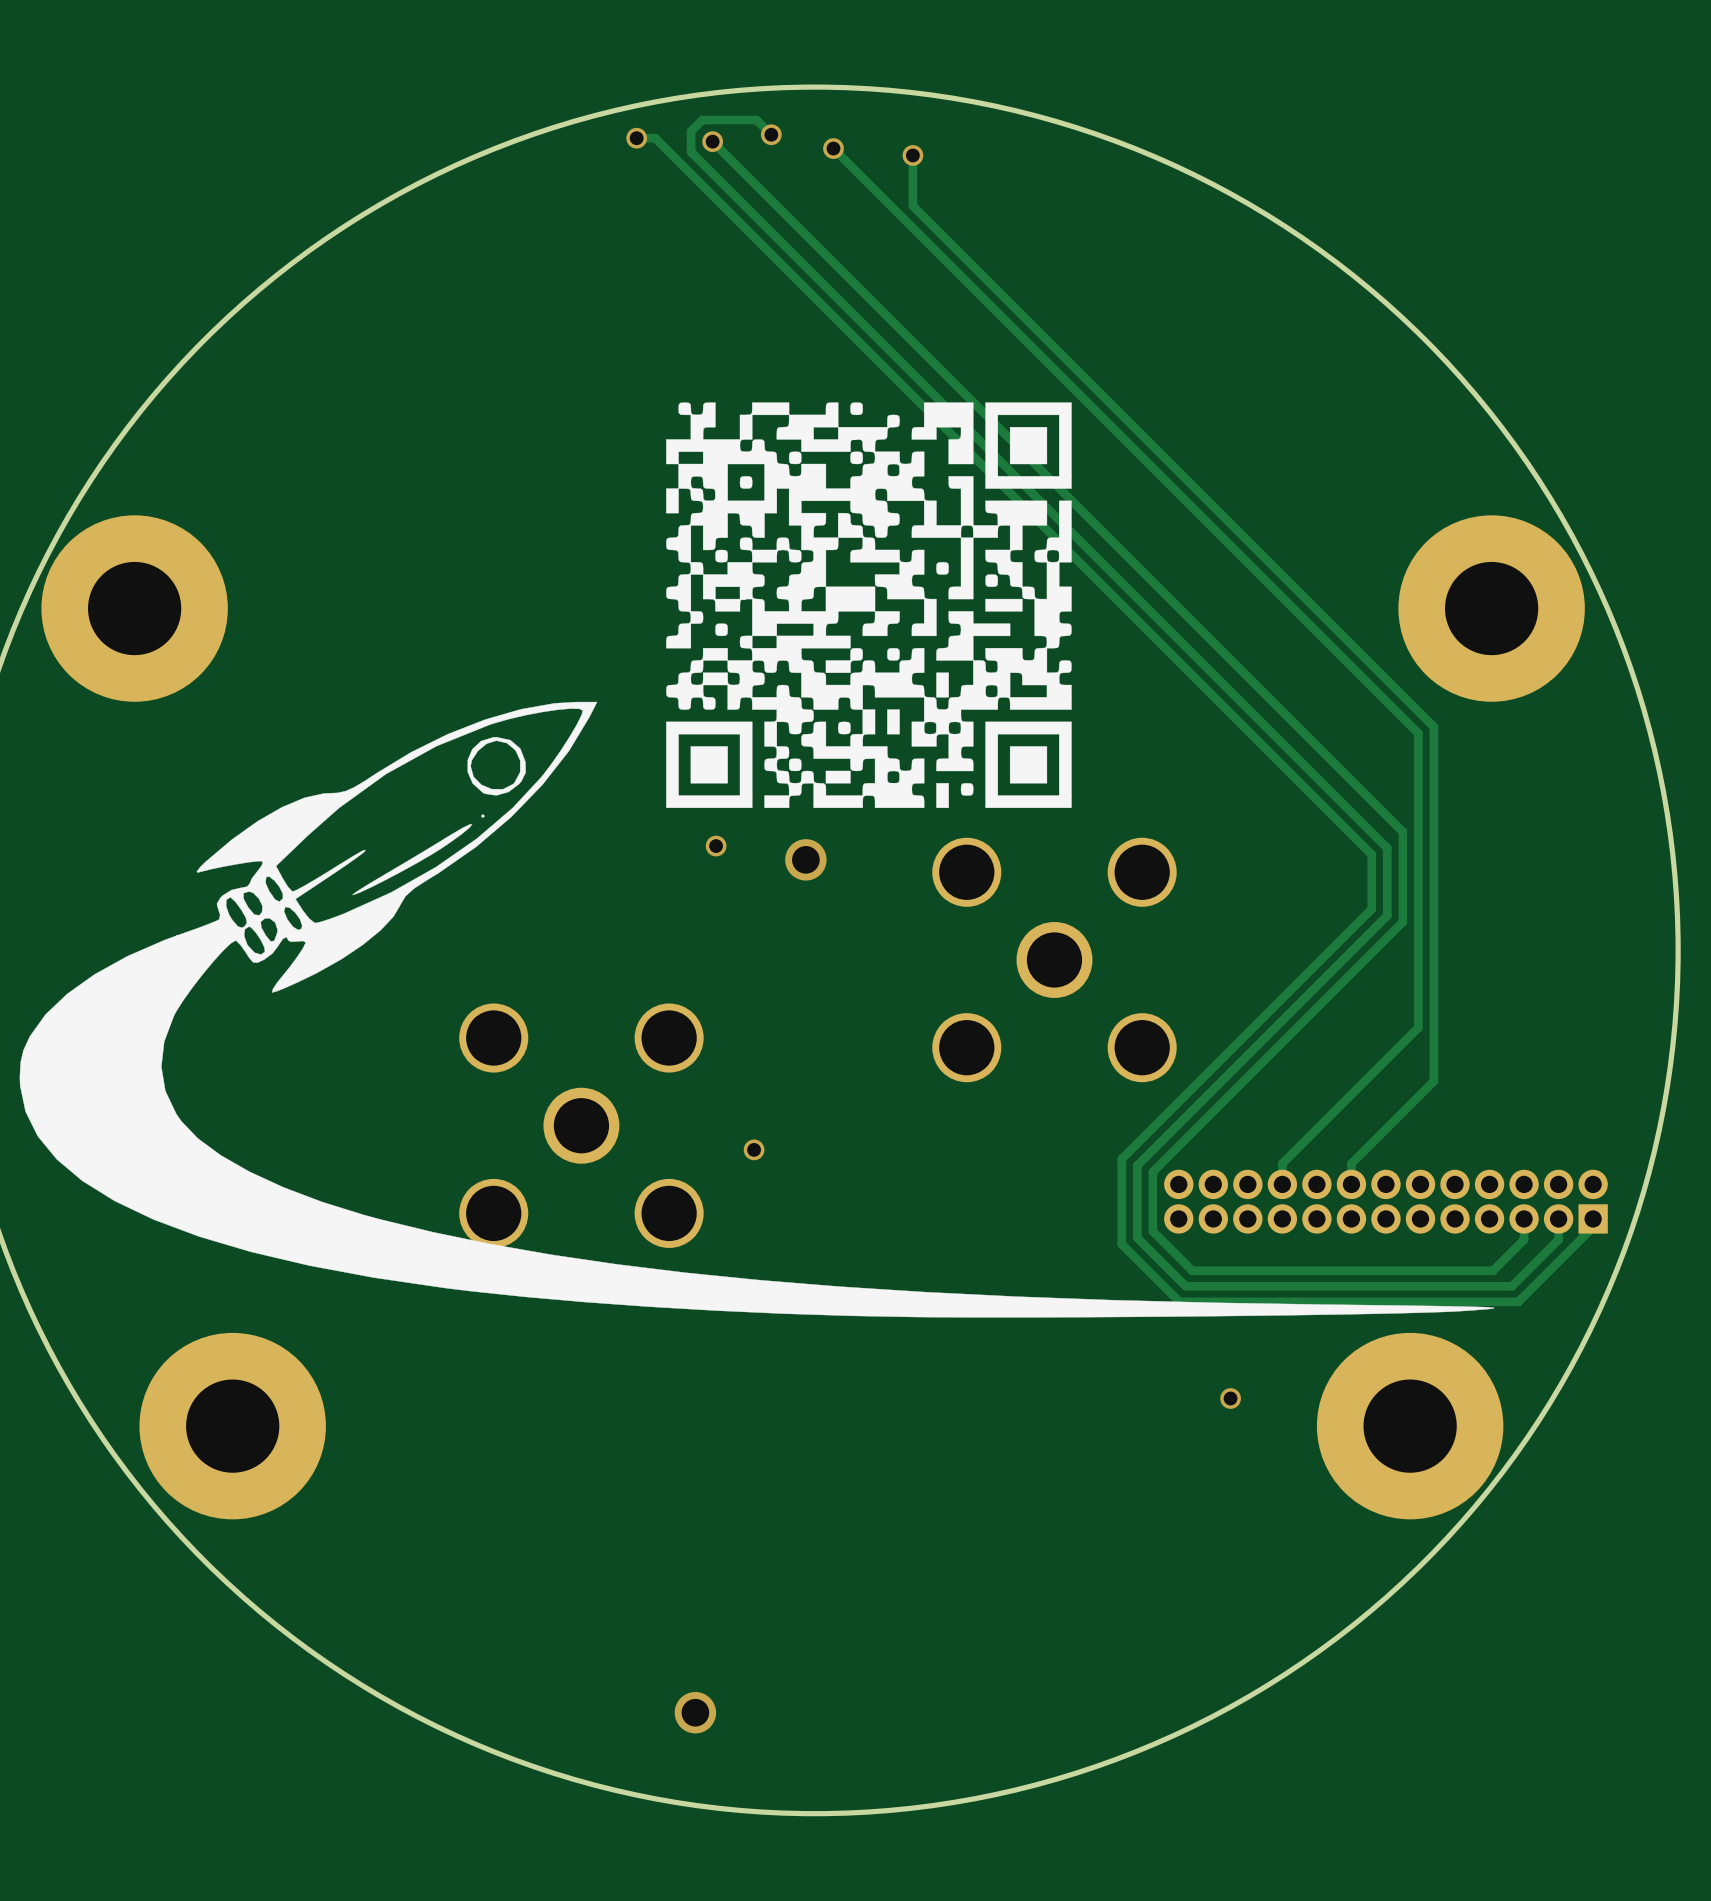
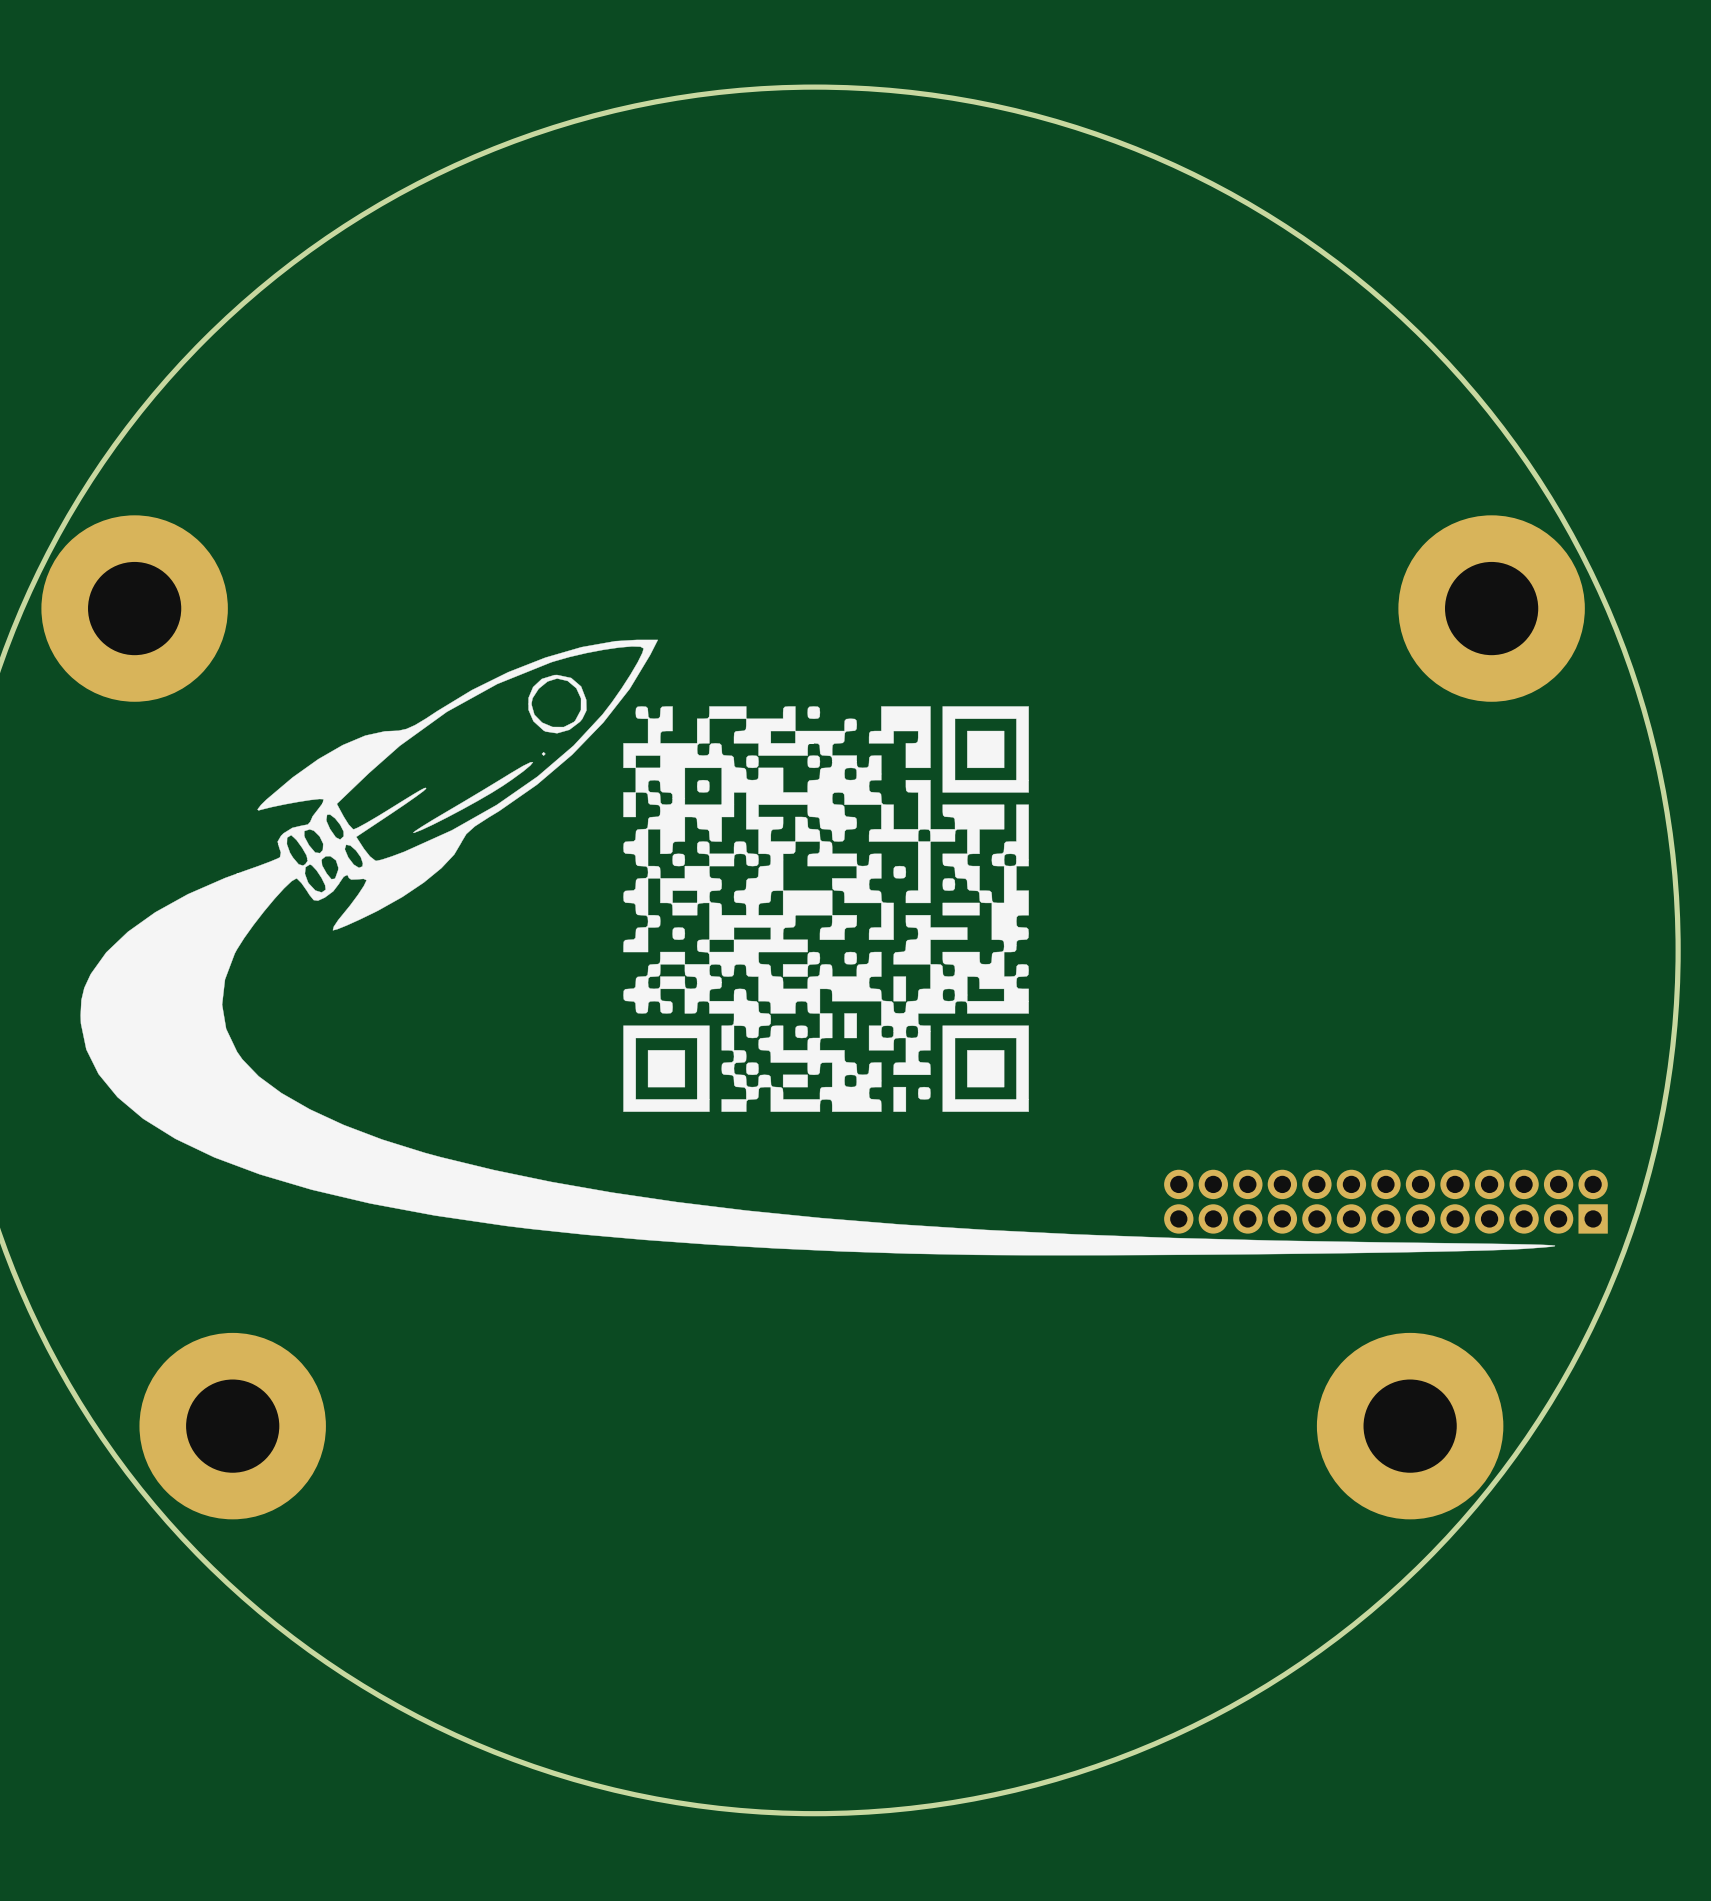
track: (771, 134) (756, 120) (702, 120) (691, 131) (691, 152) (1387, 848) (1387, 915) (1137, 1165) (1137, 1237) (1185, 1286) (1512, 1286) (1558, 1239) (1558, 1218) -> none
via: (771, 134) -> none
track: (636, 138) (655, 138) (1371, 854) (1371, 909) (1121, 1159) (1121, 1244) (1179, 1301) (1518, 1301) (1593, 1227) (1593, 1218) -> none
via: (636, 138) -> none
track: (712, 141) (1402, 831) (1402, 922) (1152, 1171) (1152, 1231) (1192, 1270) (1493, 1270) (1524, 1239) (1524, 1218) -> none
via: (712, 141) -> none
track: (833, 148) (1418, 733) (1418, 1027) (1282, 1163) (1282, 1184) -> none
via: (833, 148) -> none
track: (912, 155) (912, 205) (1433, 727) (1433, 1081) (1351, 1163) (1351, 1184) -> none
via: (912, 155) -> none
drawing position: (868, 605) -> (826, 909)
via: (716, 846) -> none
via: (805, 859) -> none
part: (1054, 959) -> none
drawing position: (757, 1009) -> (817, 947)
part: (581, 1125) -> none
via: (754, 1149) -> none
via: (1230, 1398) -> none
via: (695, 1712) -> none

